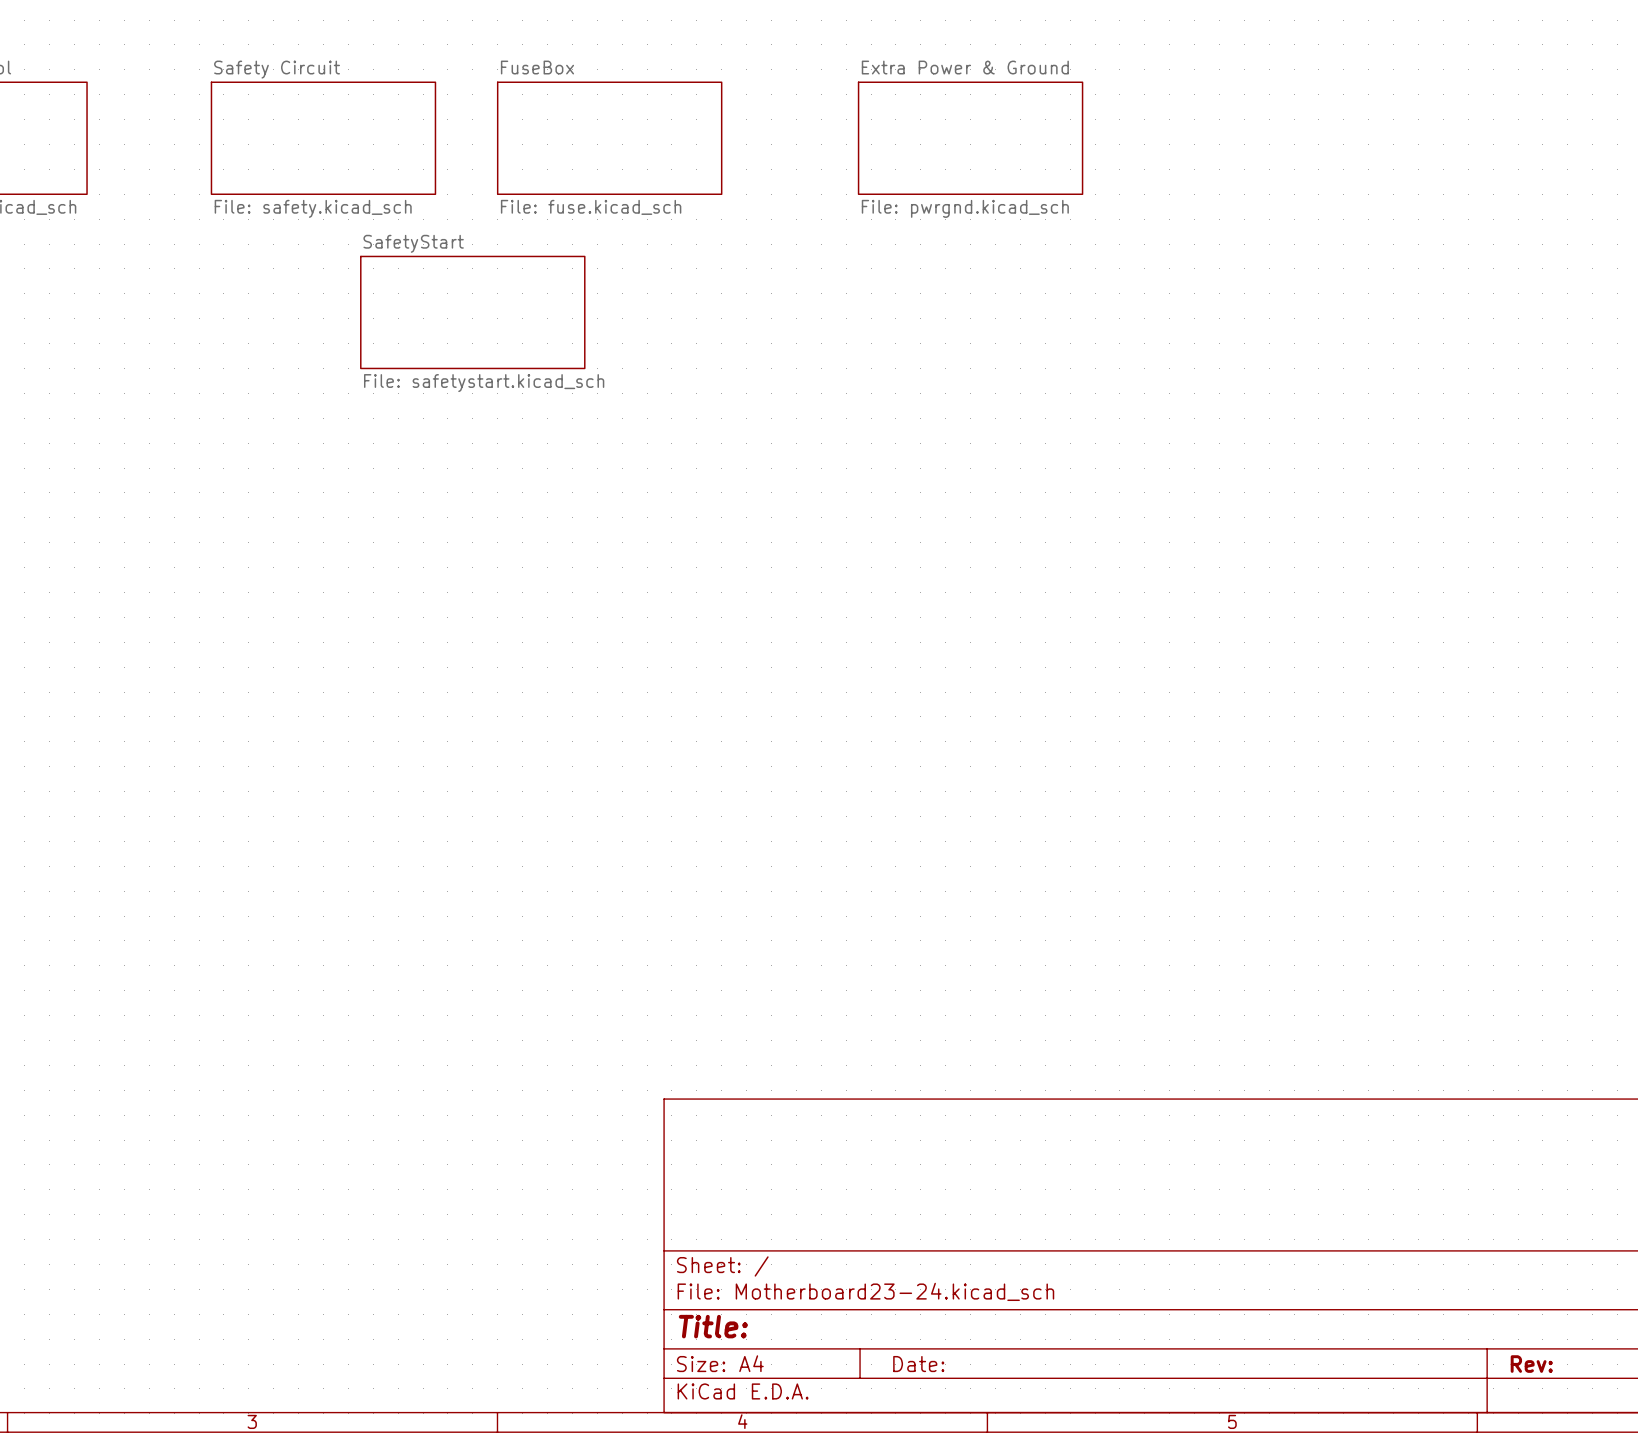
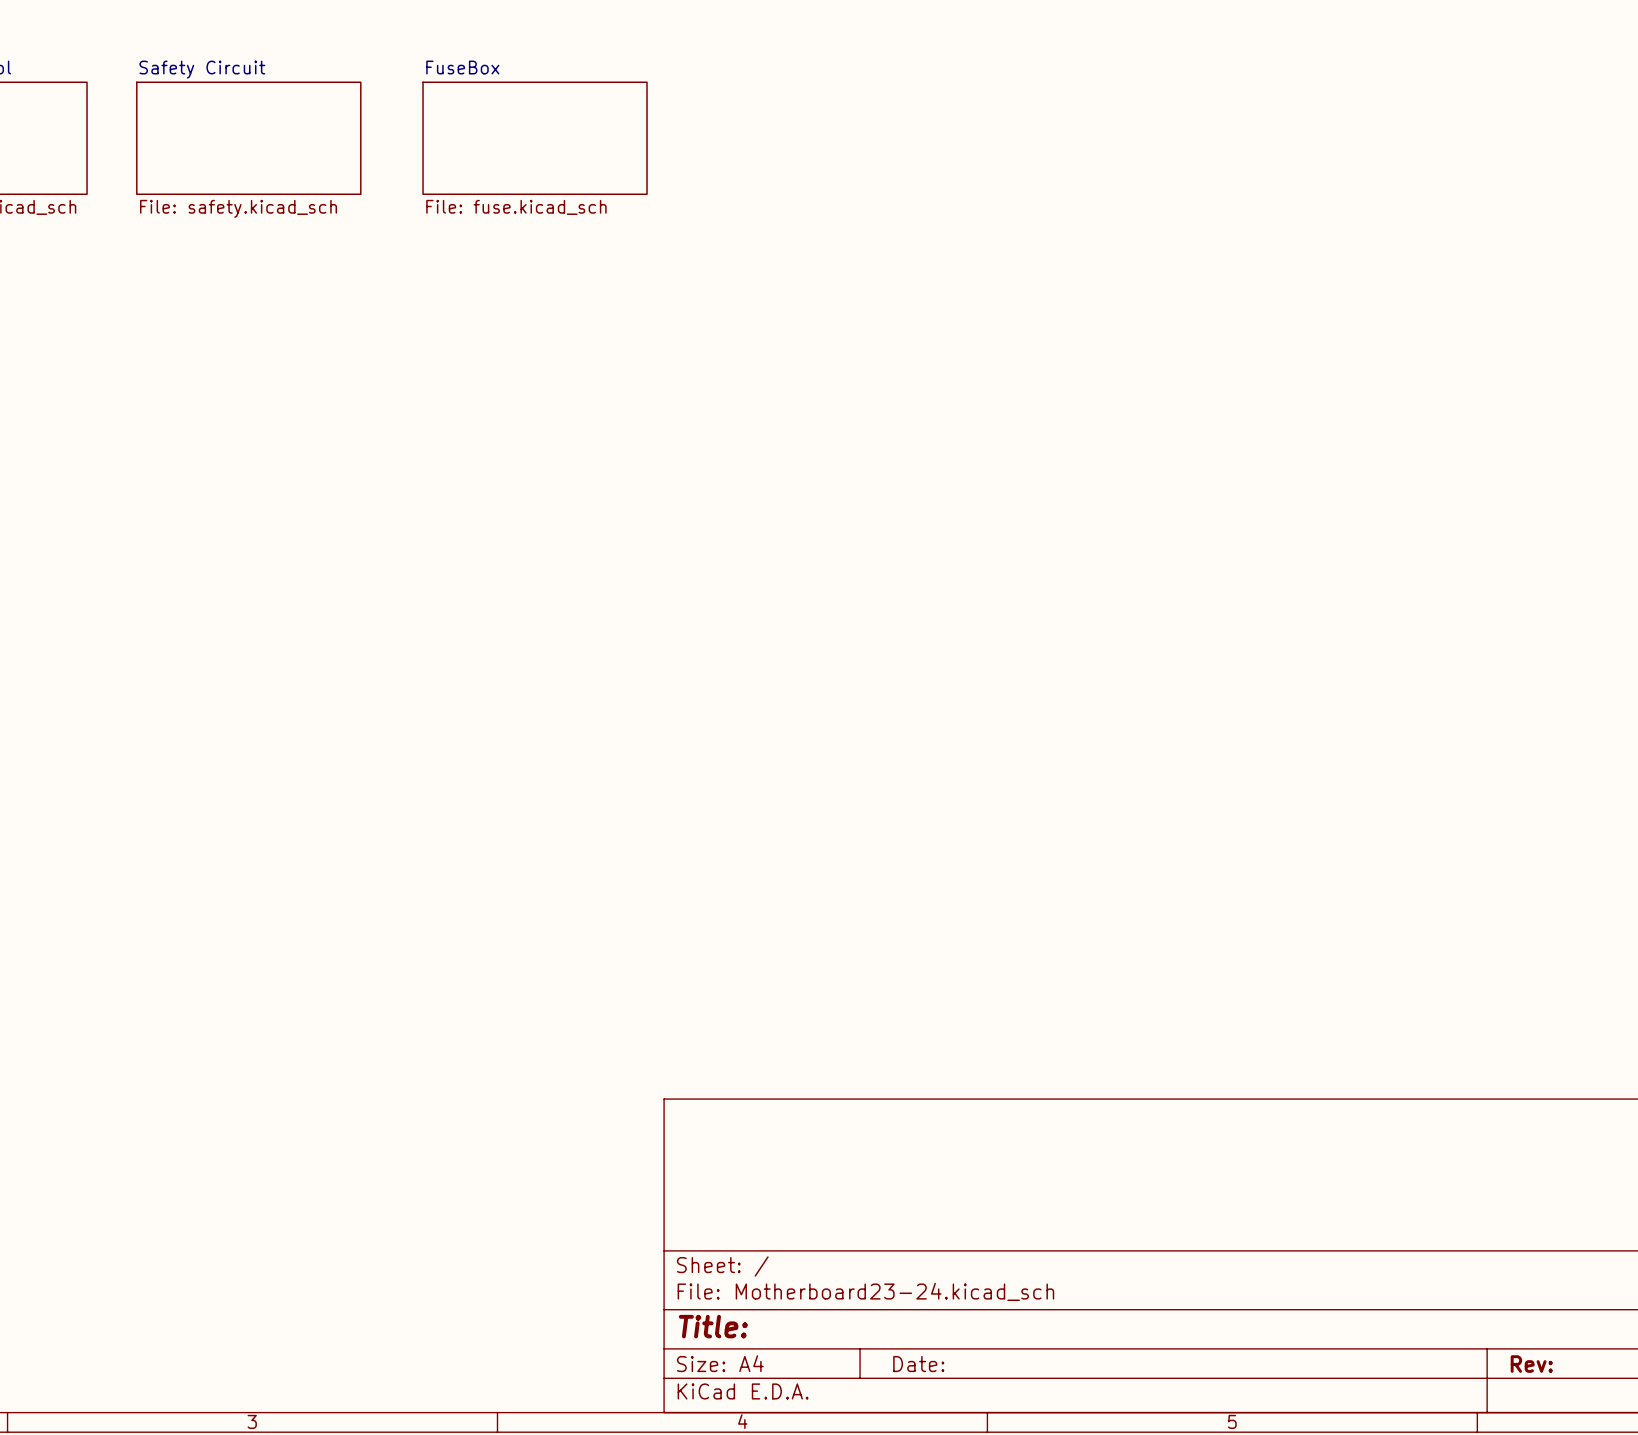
sheet Safety Circuit position: (323, 138) -> (248, 138)
sheet FuseBox position: (609, 138) -> (535, 138)
sheet Extra Power & Ground: File: pwrgnd.kicad_sch (970, 138) -> none
sheet SafetyStart: File: safetystart.kicad_sch (472, 312) -> none

